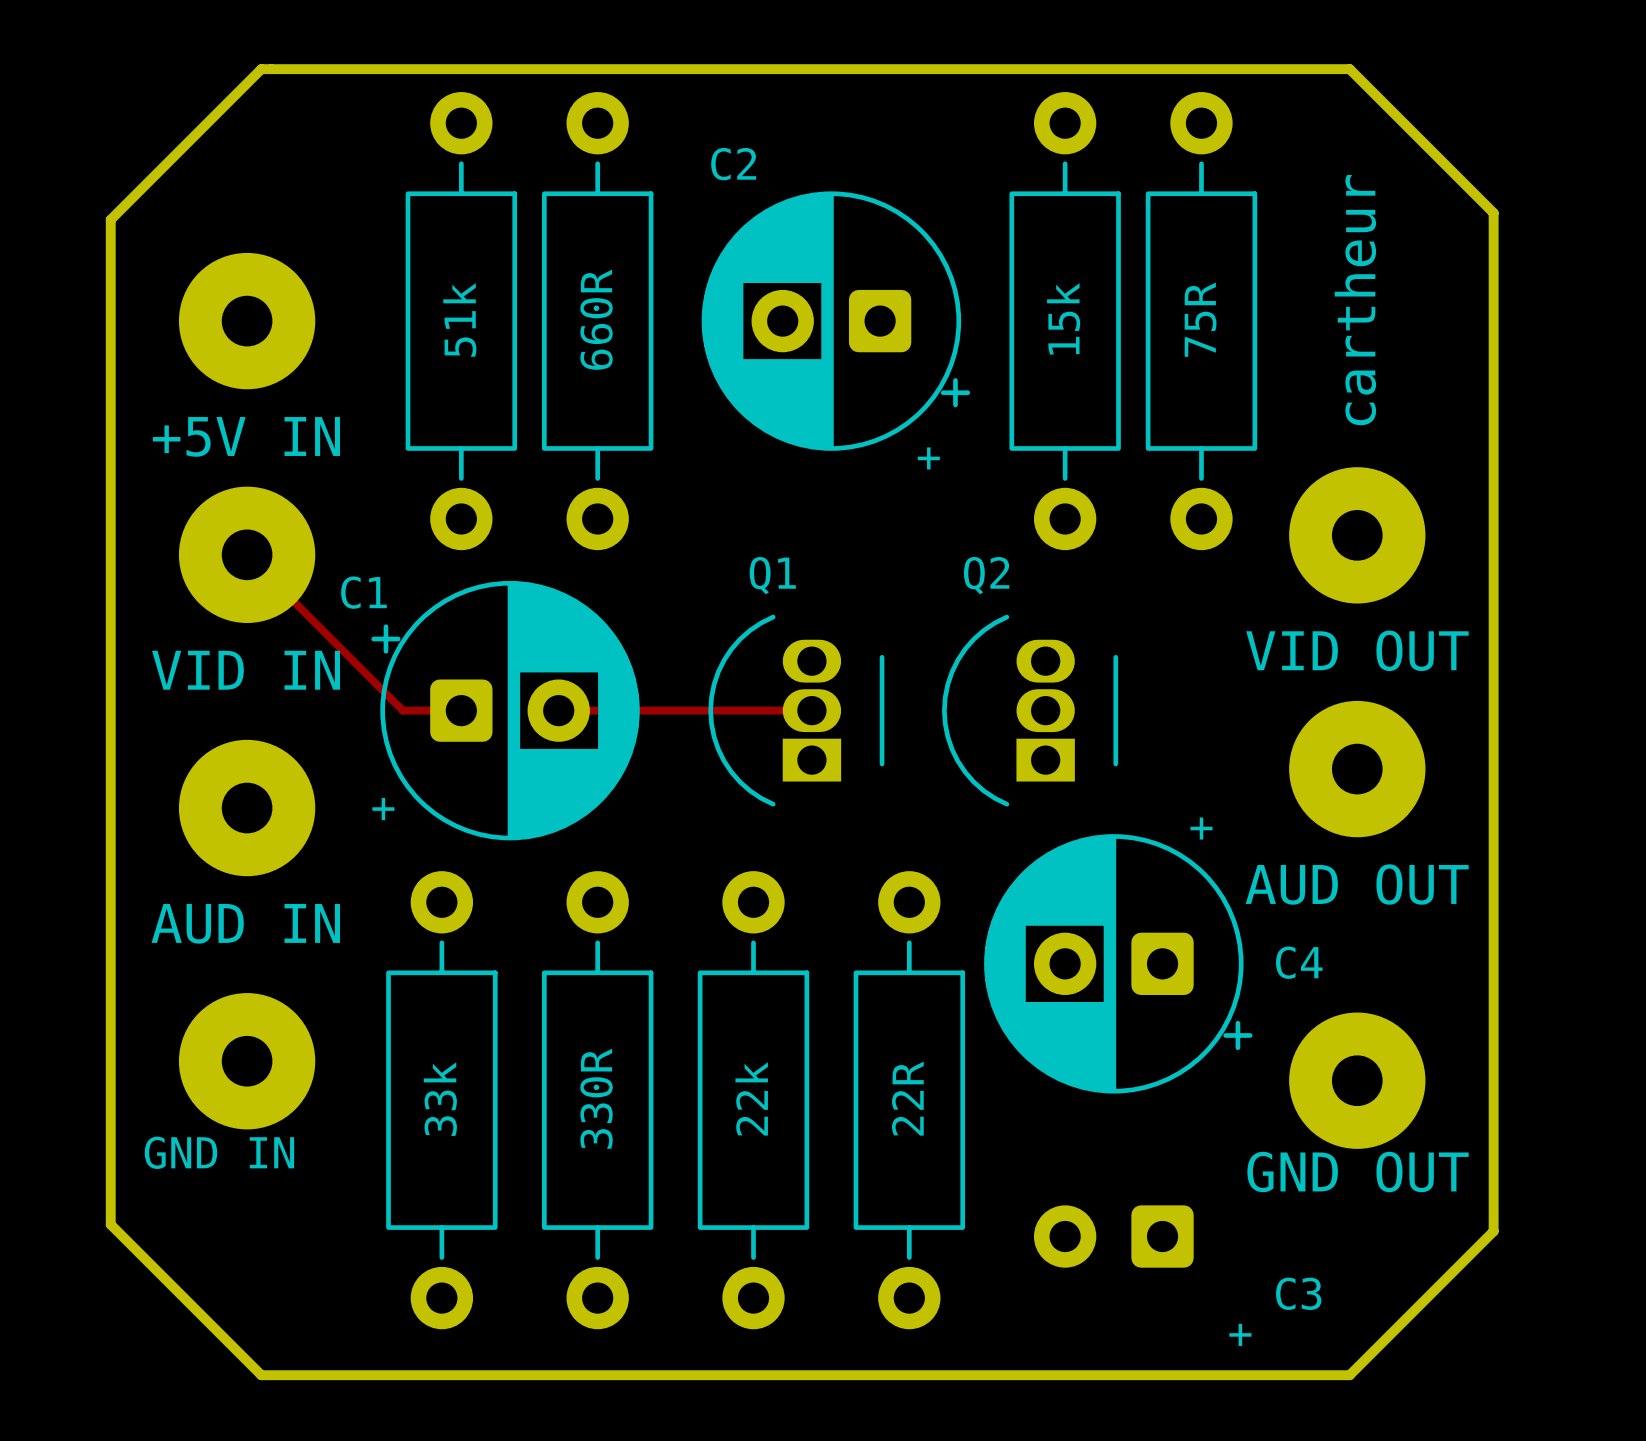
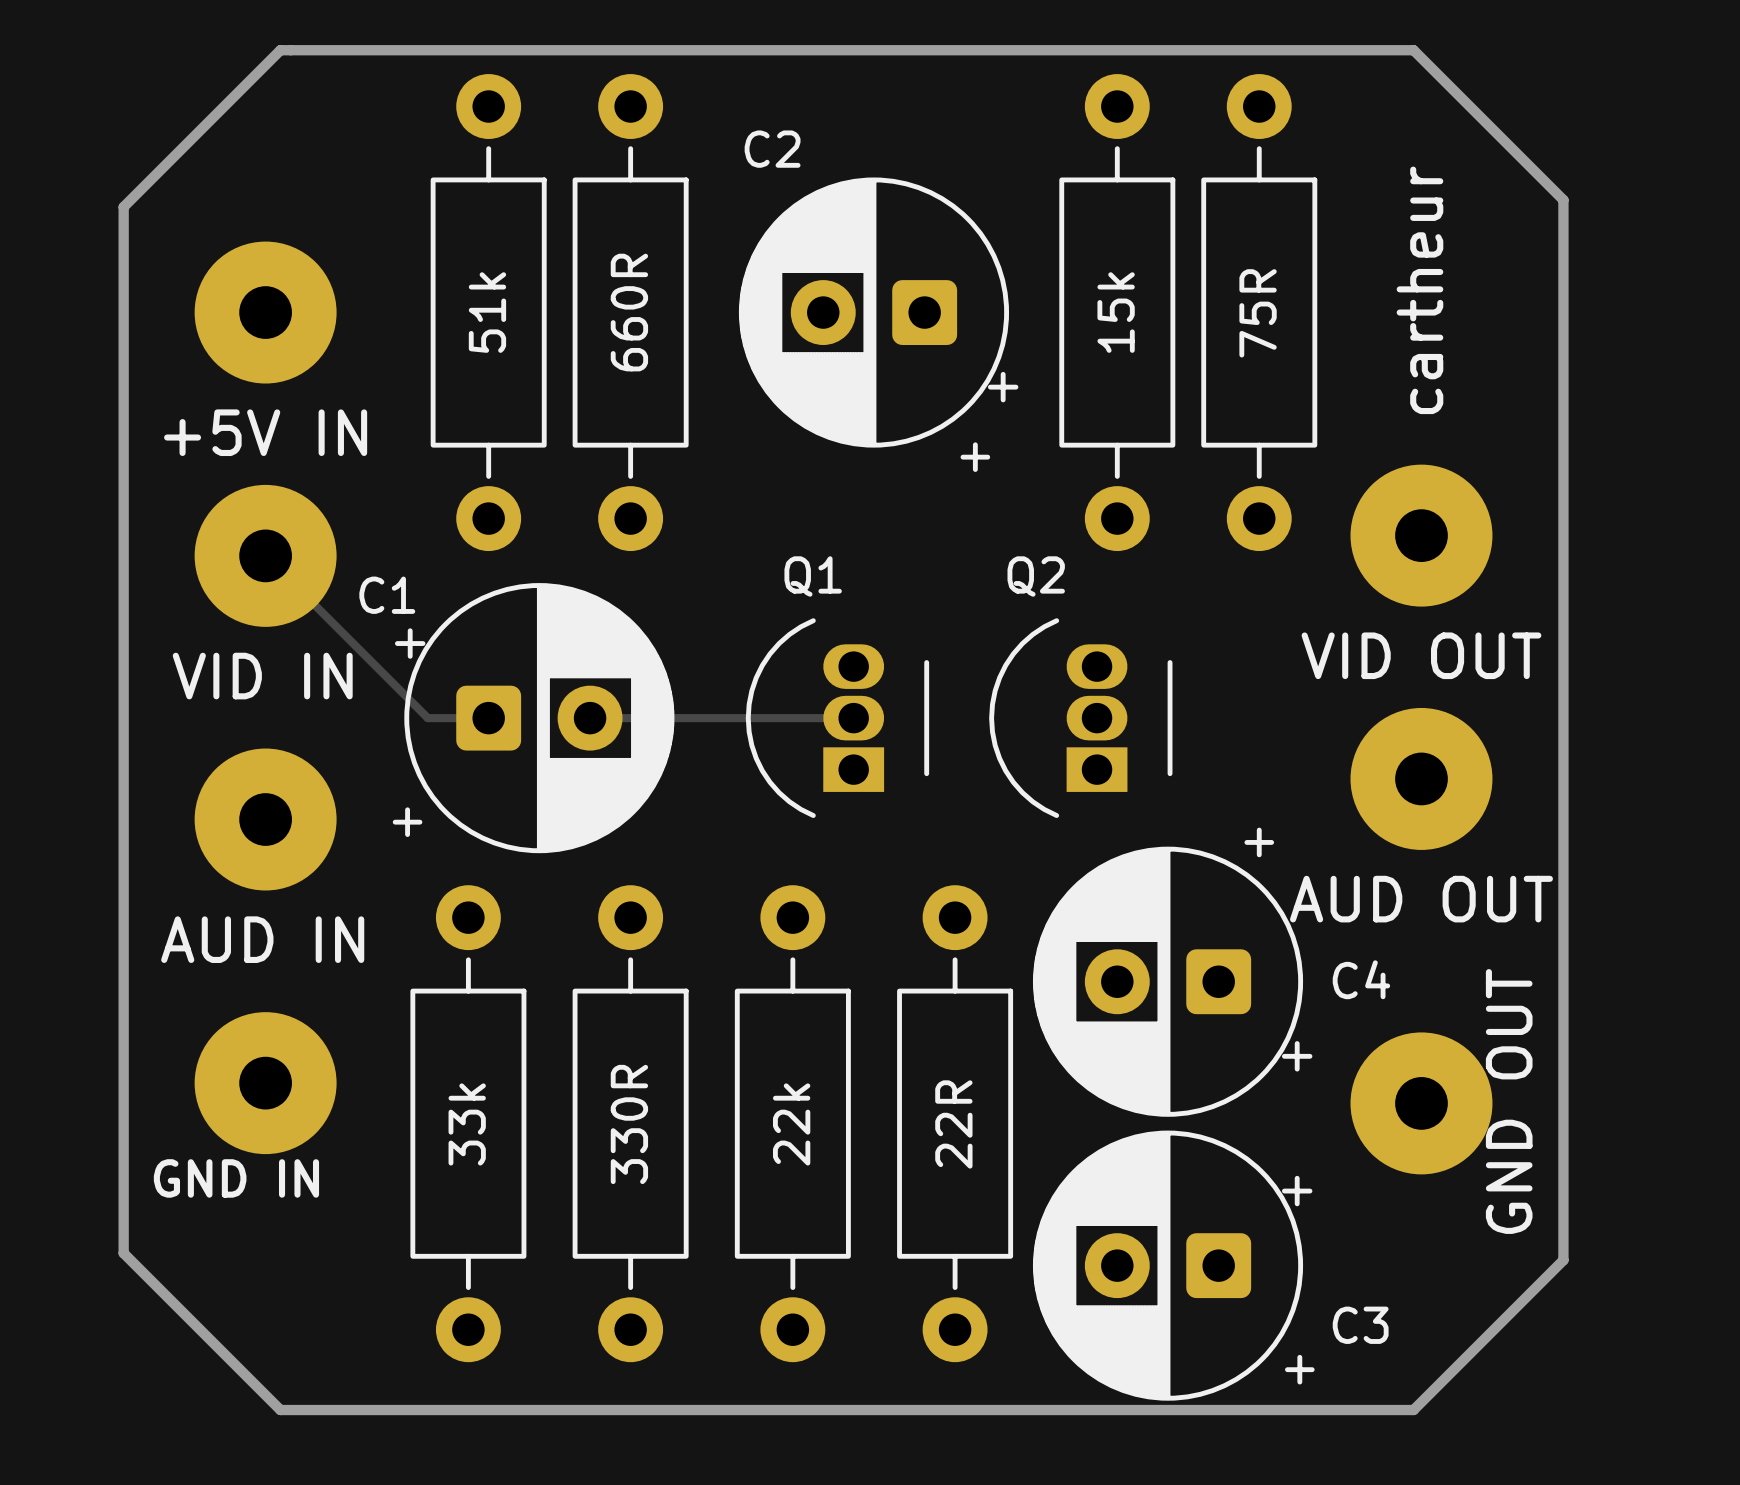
part value rotation: 0° (1358, 1171) -> 90° counterclockwise (1509, 1101)
part footprint: [1033, 1205, 1194, 1268] -> [1032, 1130, 1313, 1401]

